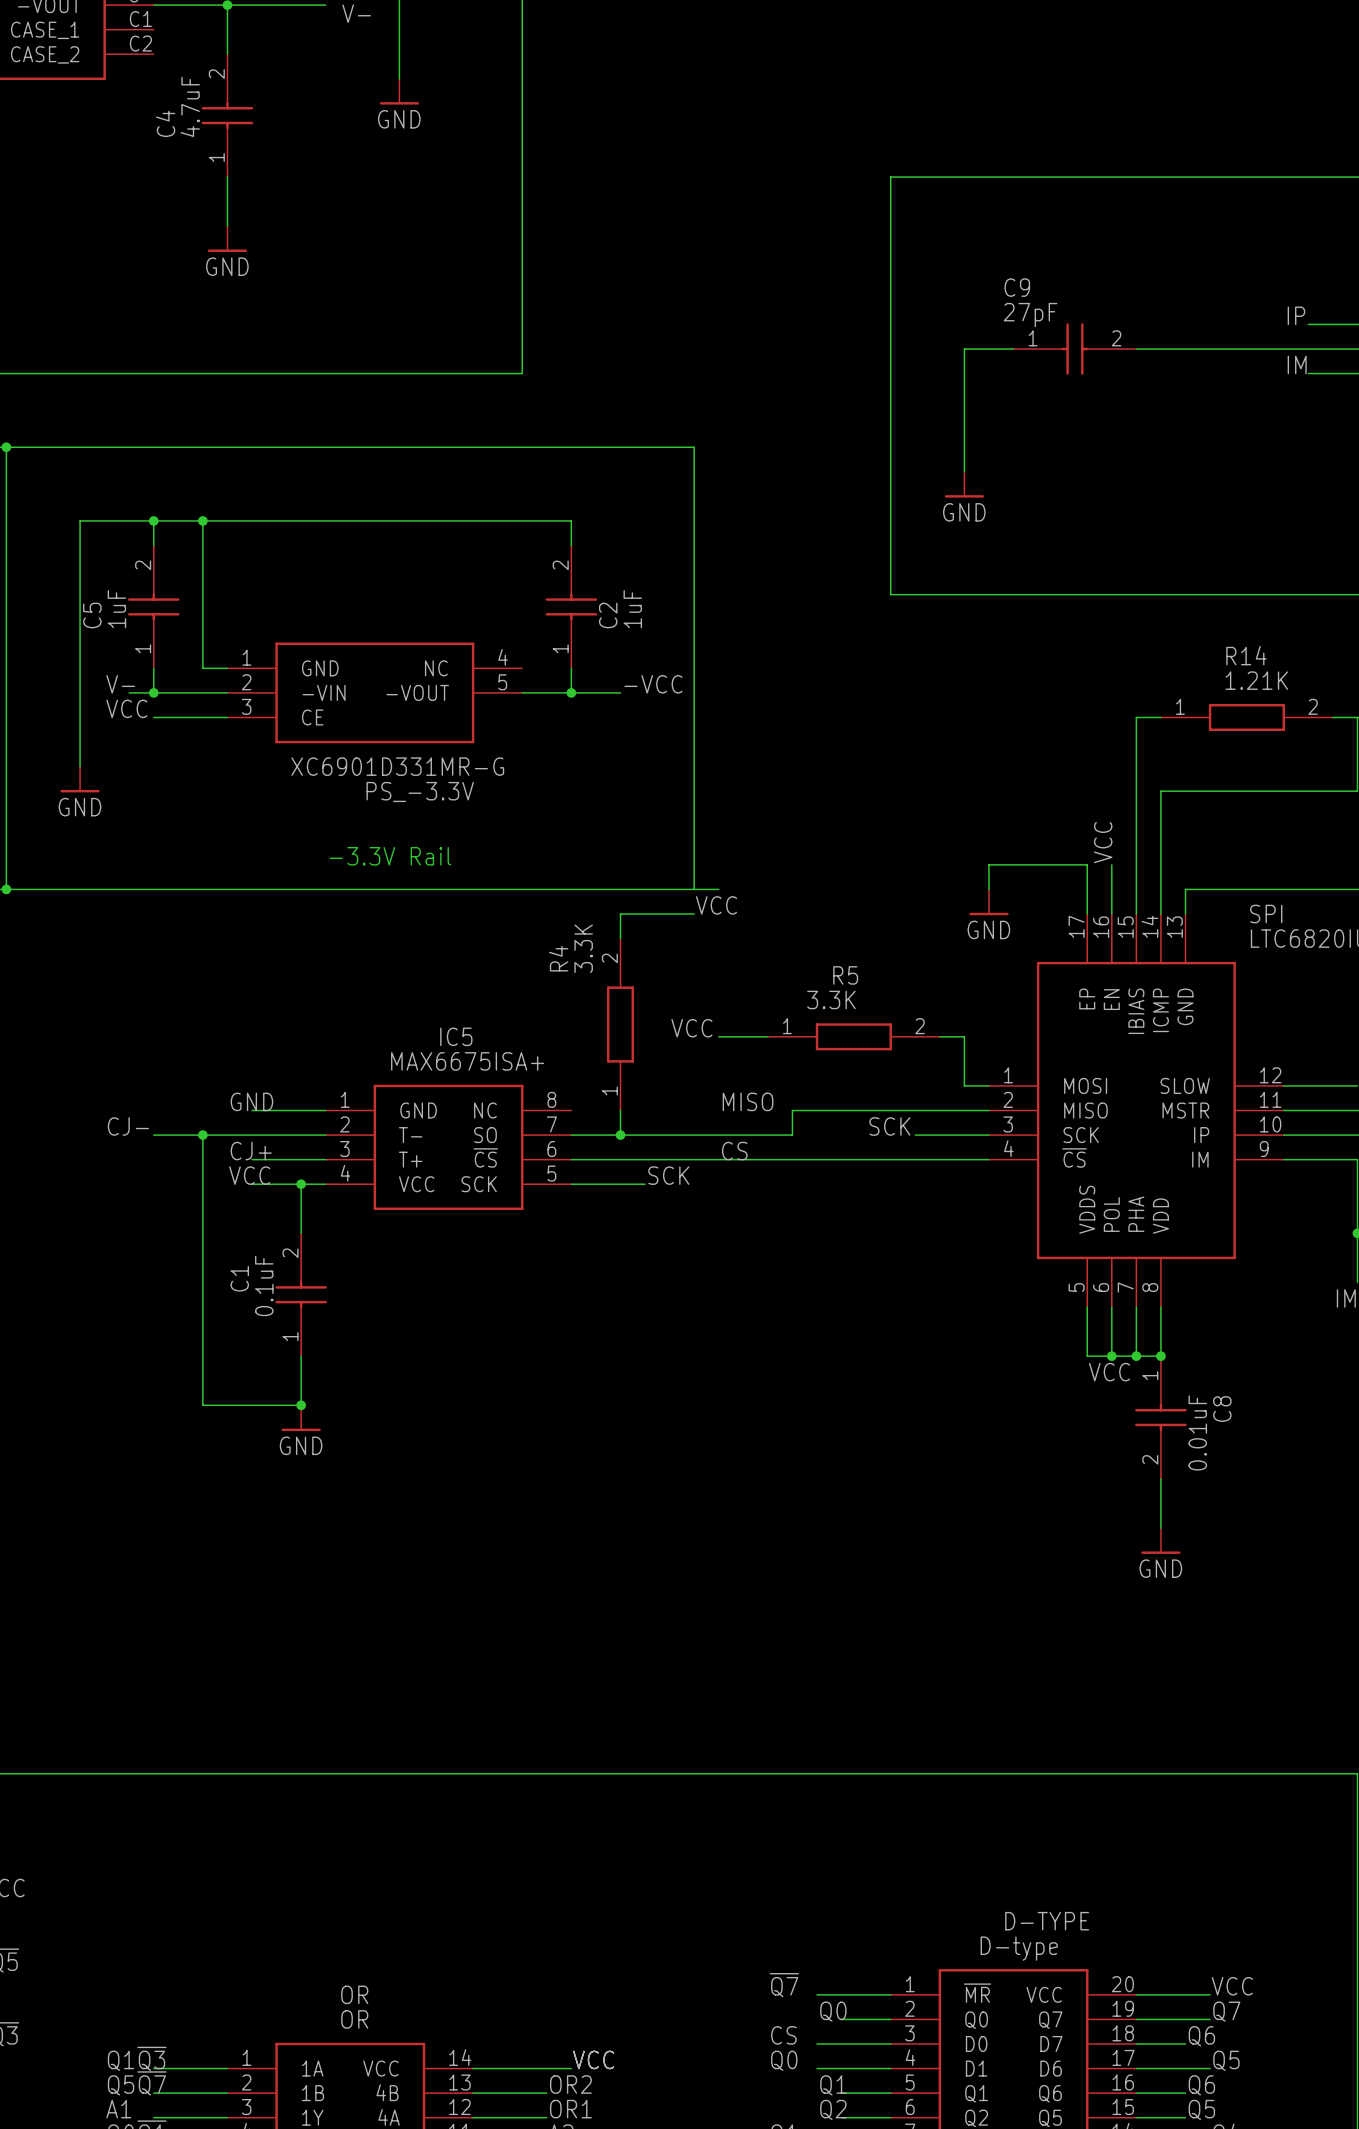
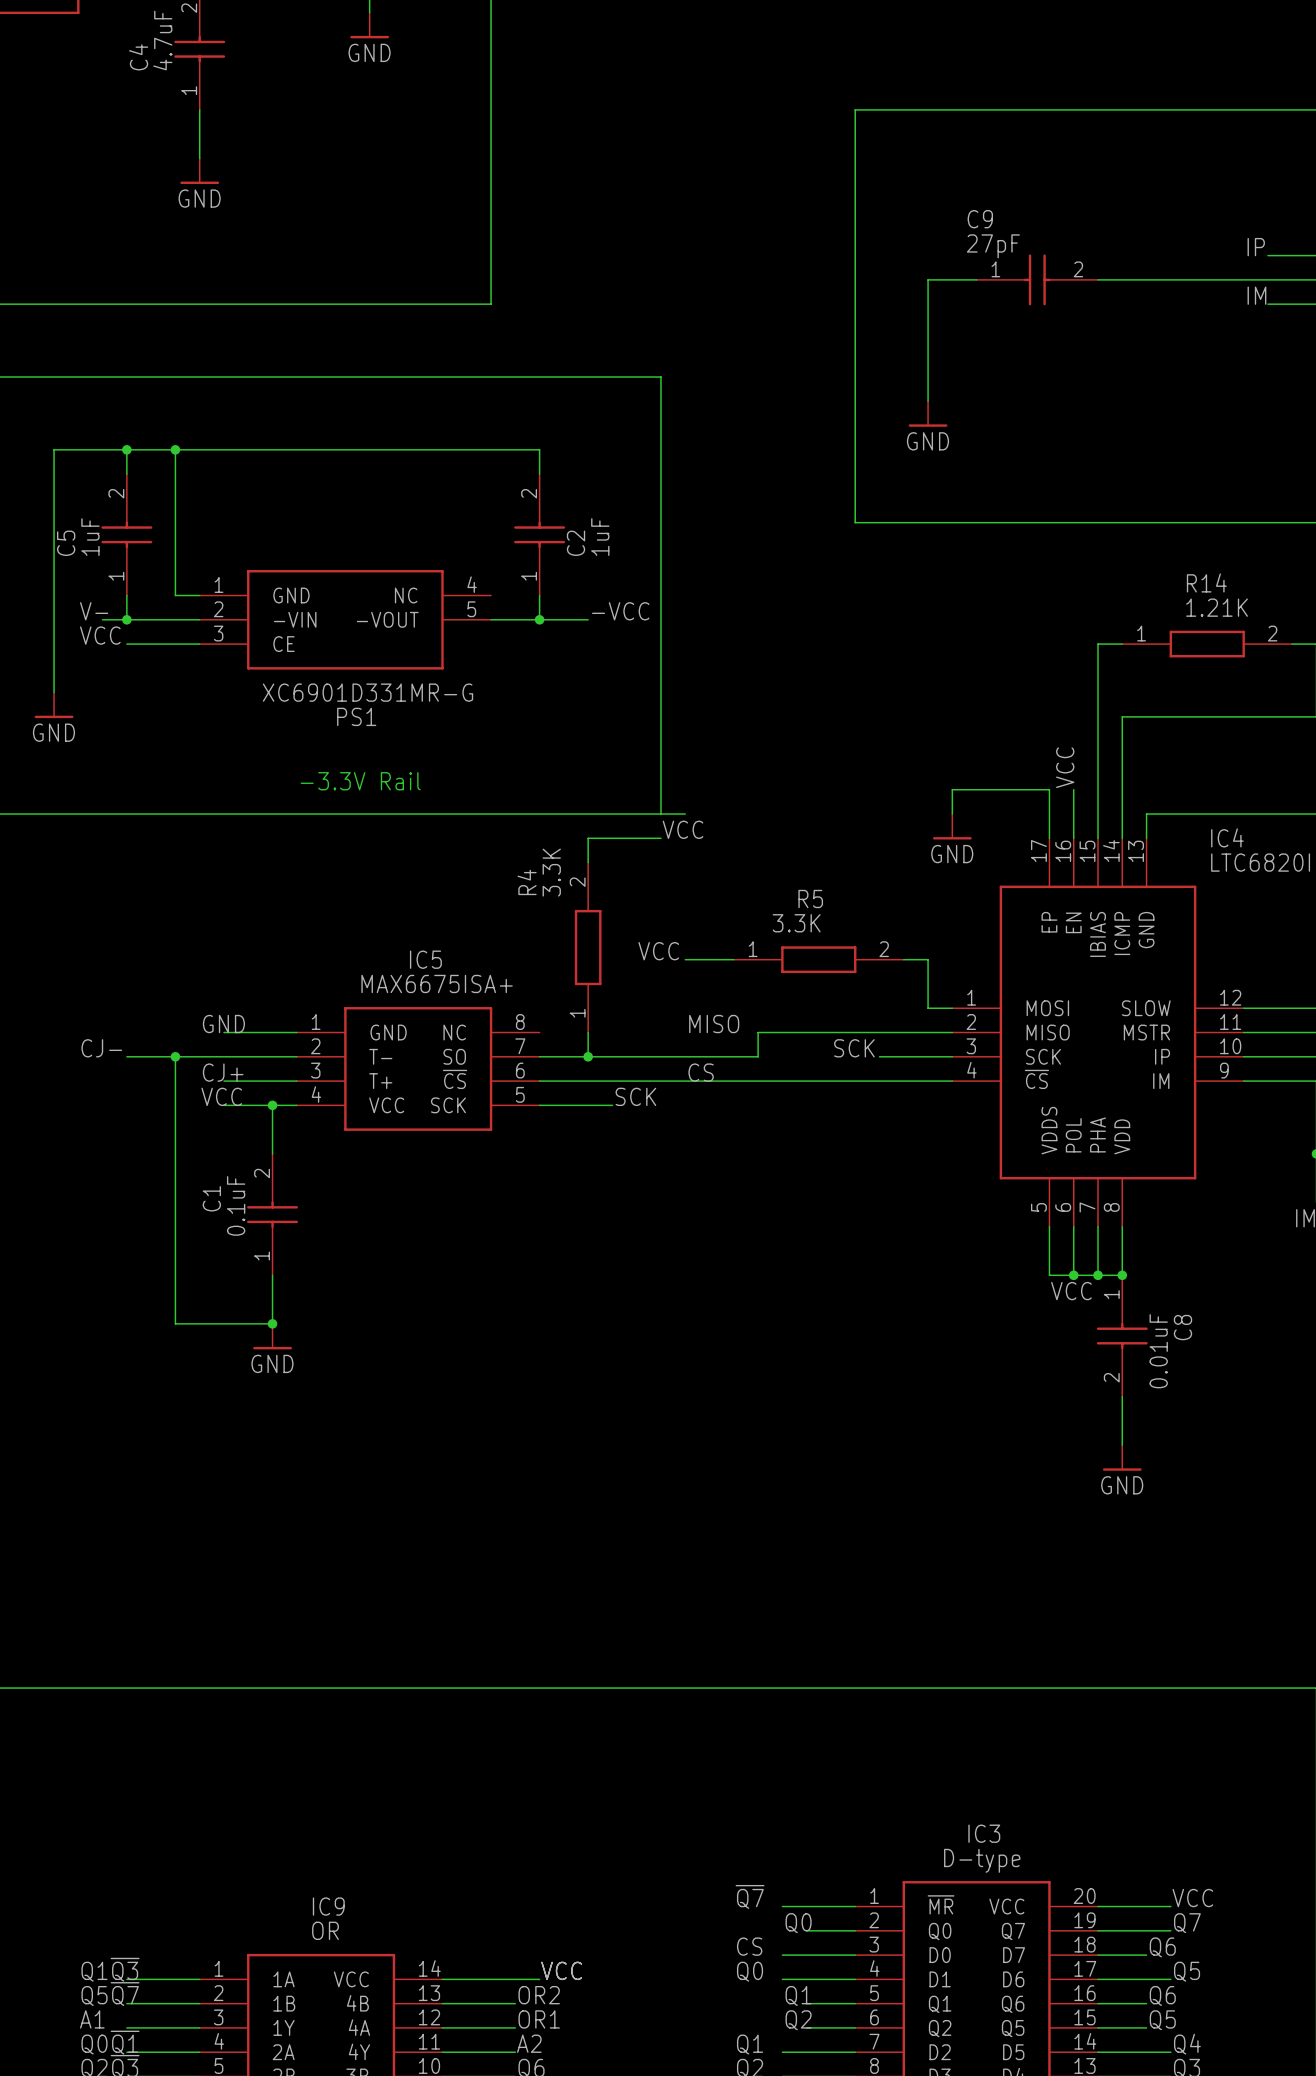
PS_-3.3V name: PS_-3.3V (420, 791) -> PS1 (356, 716)
SPI name: SPI (1266, 914) -> IC4 (1227, 837)
D-TYPE name: D-TYPE (1047, 1921) -> IC3 (984, 1833)
OR name: OR (354, 1994) -> IC9 (328, 1906)

